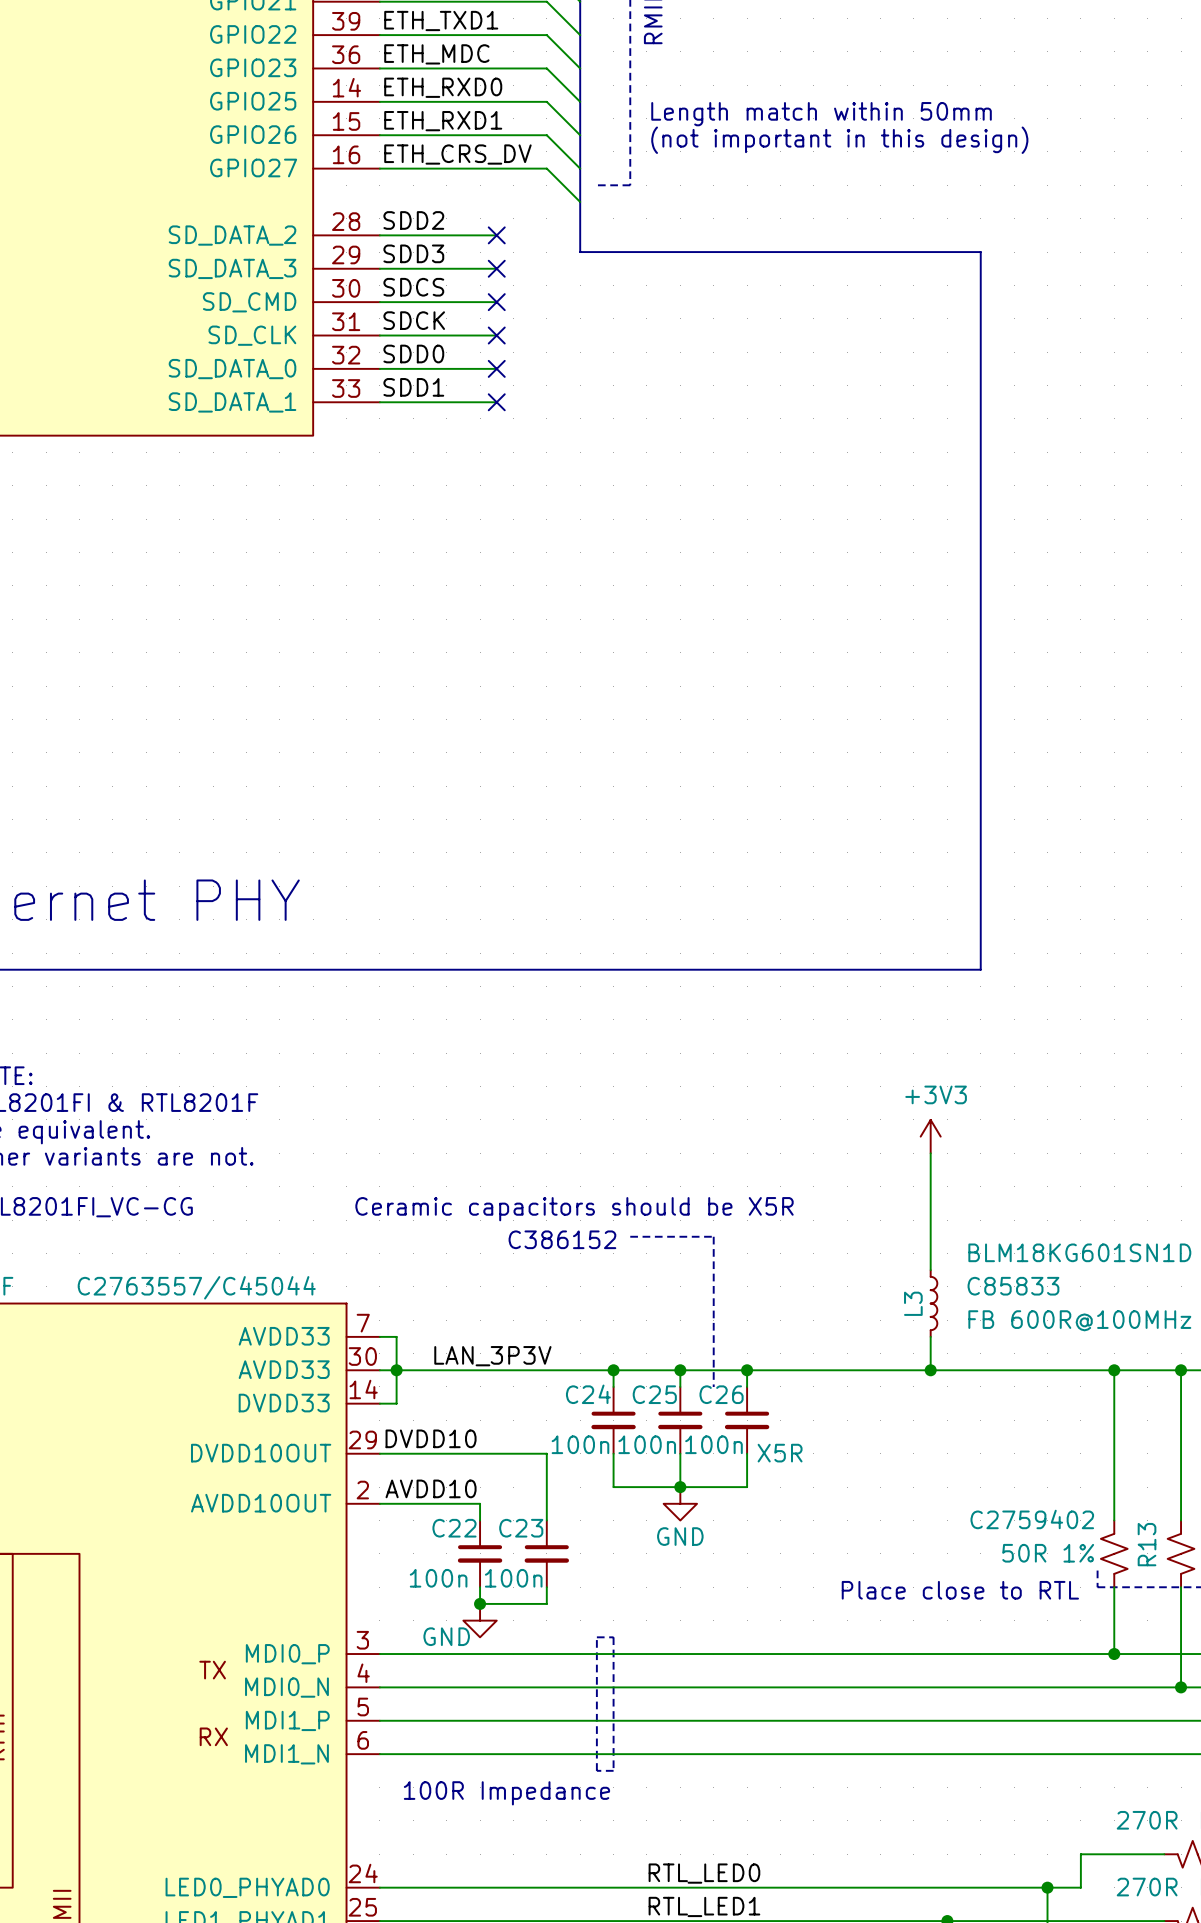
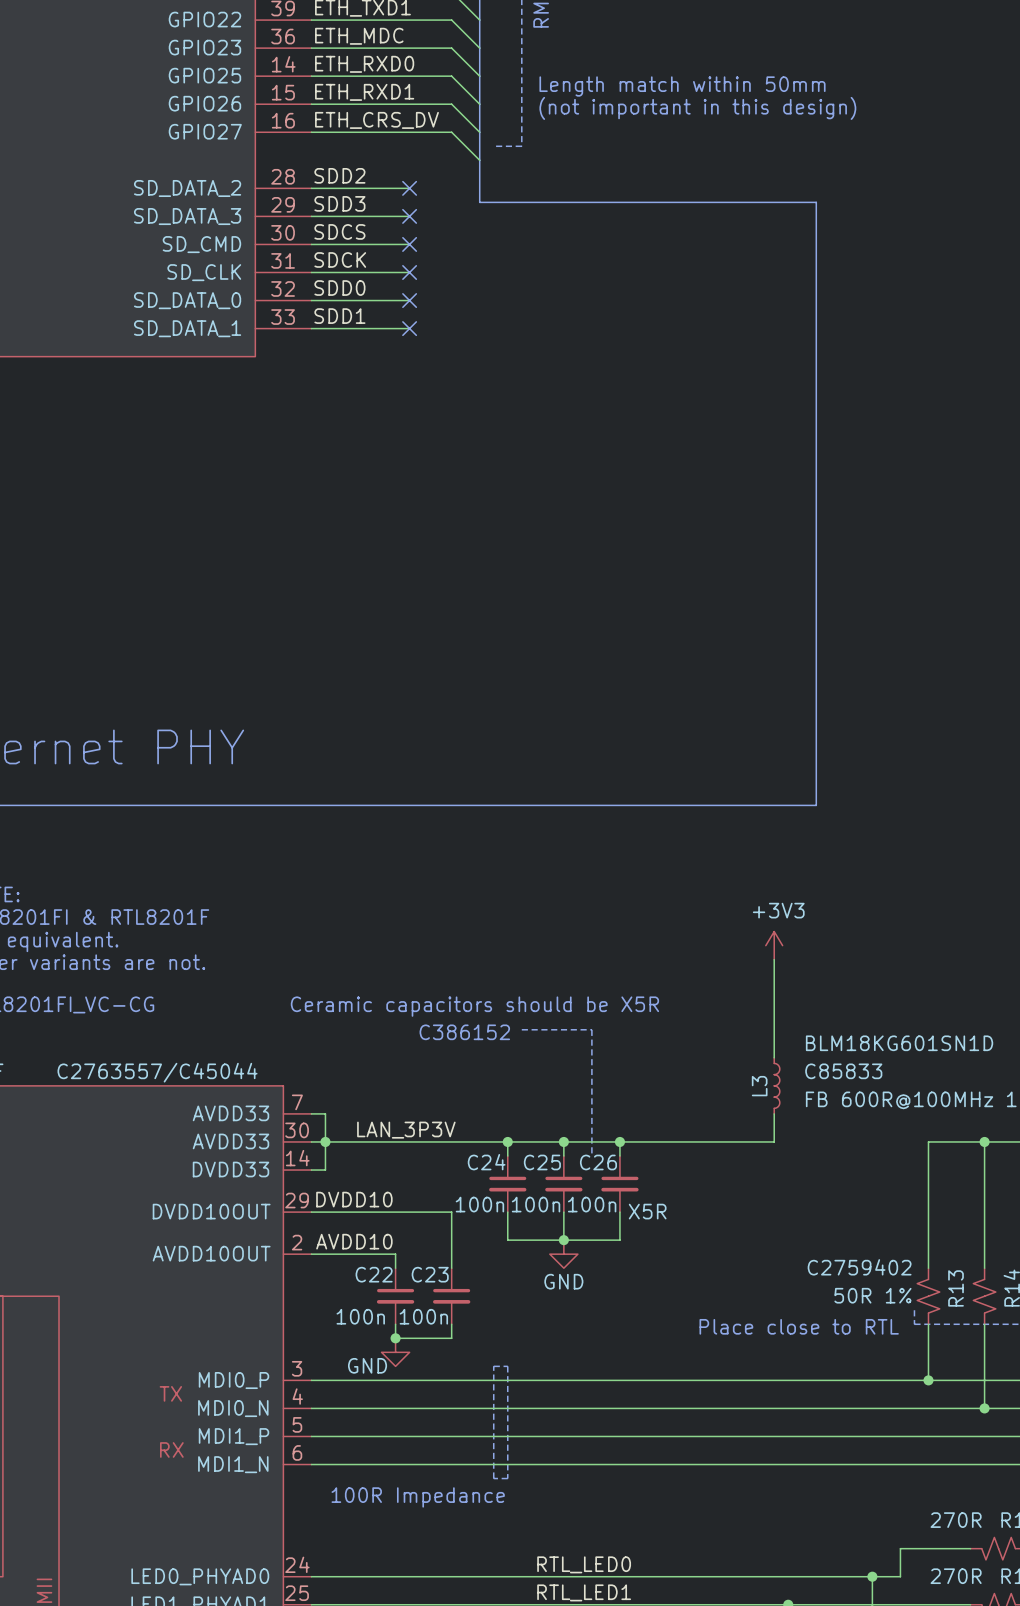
wire: (930, 1370) (1114, 1370) -> none
junction: (930, 1370) -> none
junction: (1114, 1370) -> none

